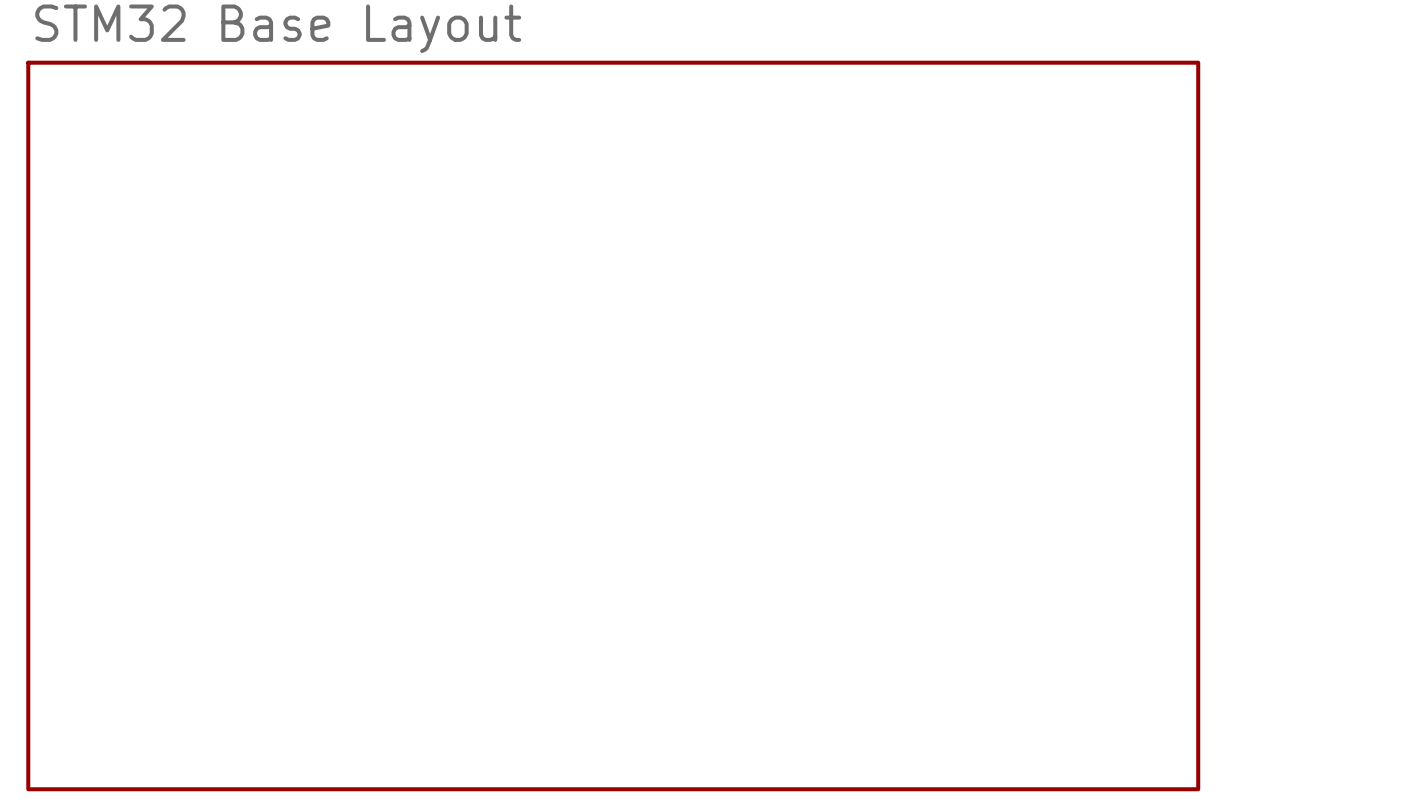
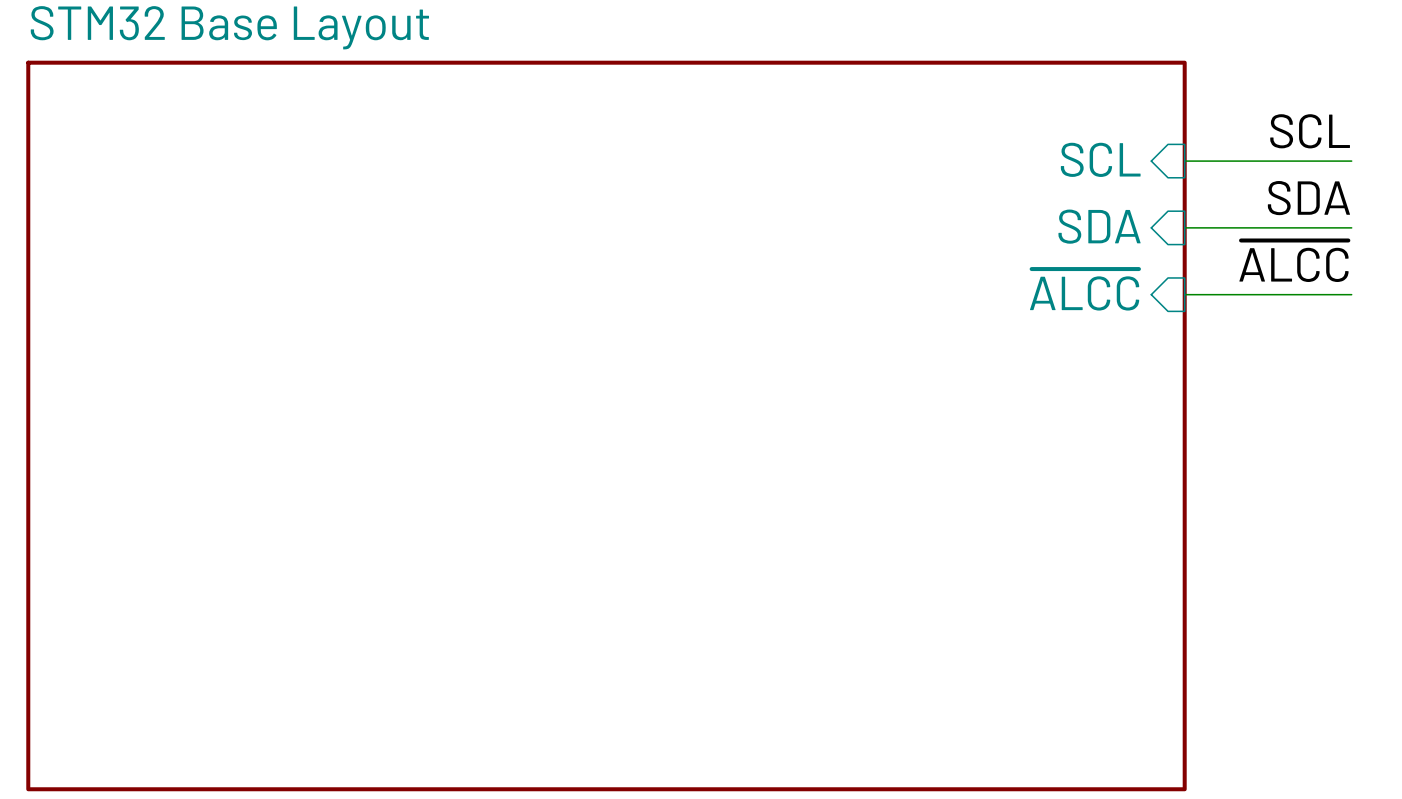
sheet STM32 Base Layout shape: [26, 60, 1201, 792] -> [26, 60, 1187, 792]
label: none -> SCL (1310, 131)
sheet pin: none -> SCL (1100, 159)
wire: none -> (1184, 161) (1351, 161)
label: none -> SDA (1308, 198)
sheet pin: none -> SDA (1099, 226)
wire: none -> (1184, 227) (1351, 227)
label: none -> ~{ALCC} (1293, 261)
sheet pin: none -> ~{ALCC} (1084, 289)
wire: none -> (1184, 294) (1351, 294)

